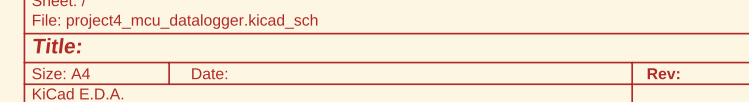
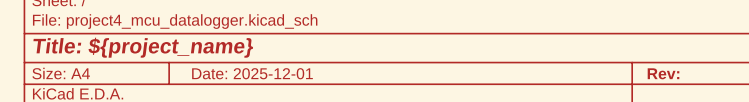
title block: Title: (57, 45) -> Title: ${project_name} (143, 47)
title block: Date: (209, 73) -> Date: 2025-12-01 (252, 73)

